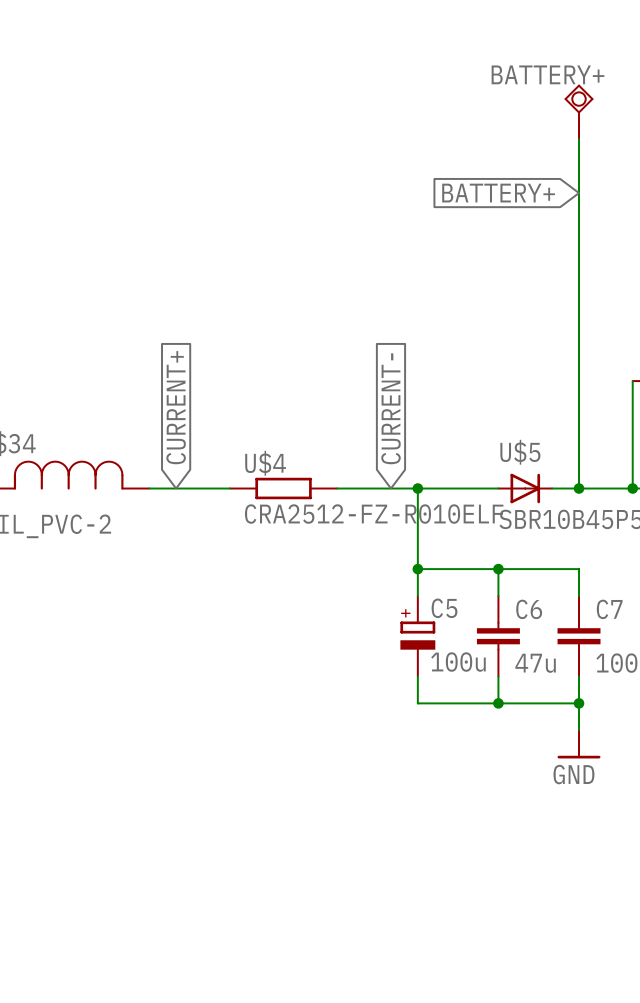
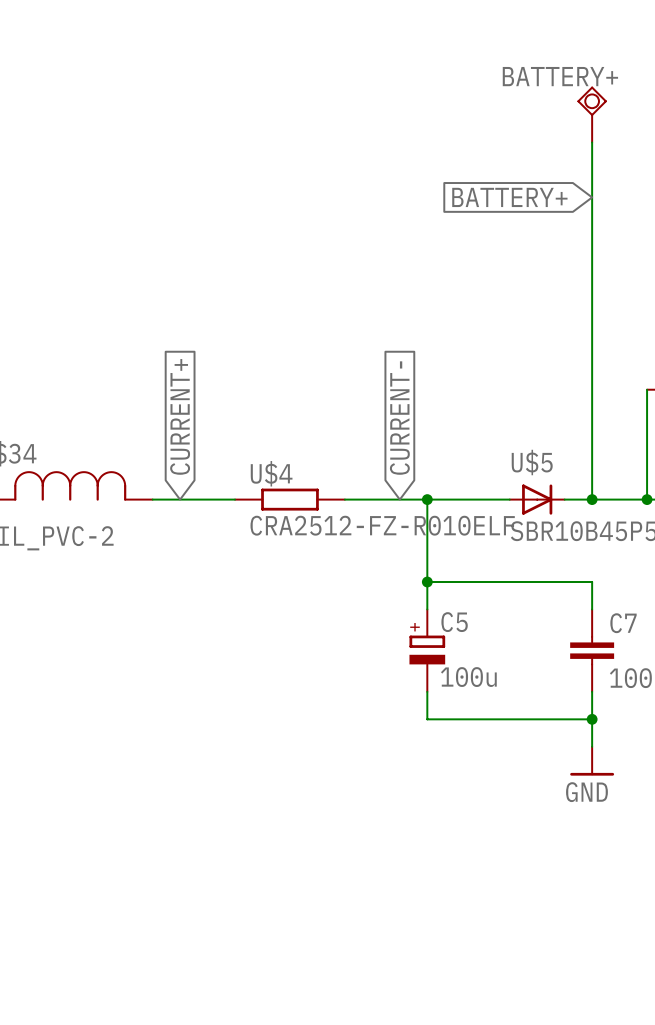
wire: (498, 569) (498, 595) -> none
junction: (498, 569) -> none
C6: 47u (498, 636) -> none
wire: (498, 676) (498, 703) -> none
junction: (498, 703) -> none

